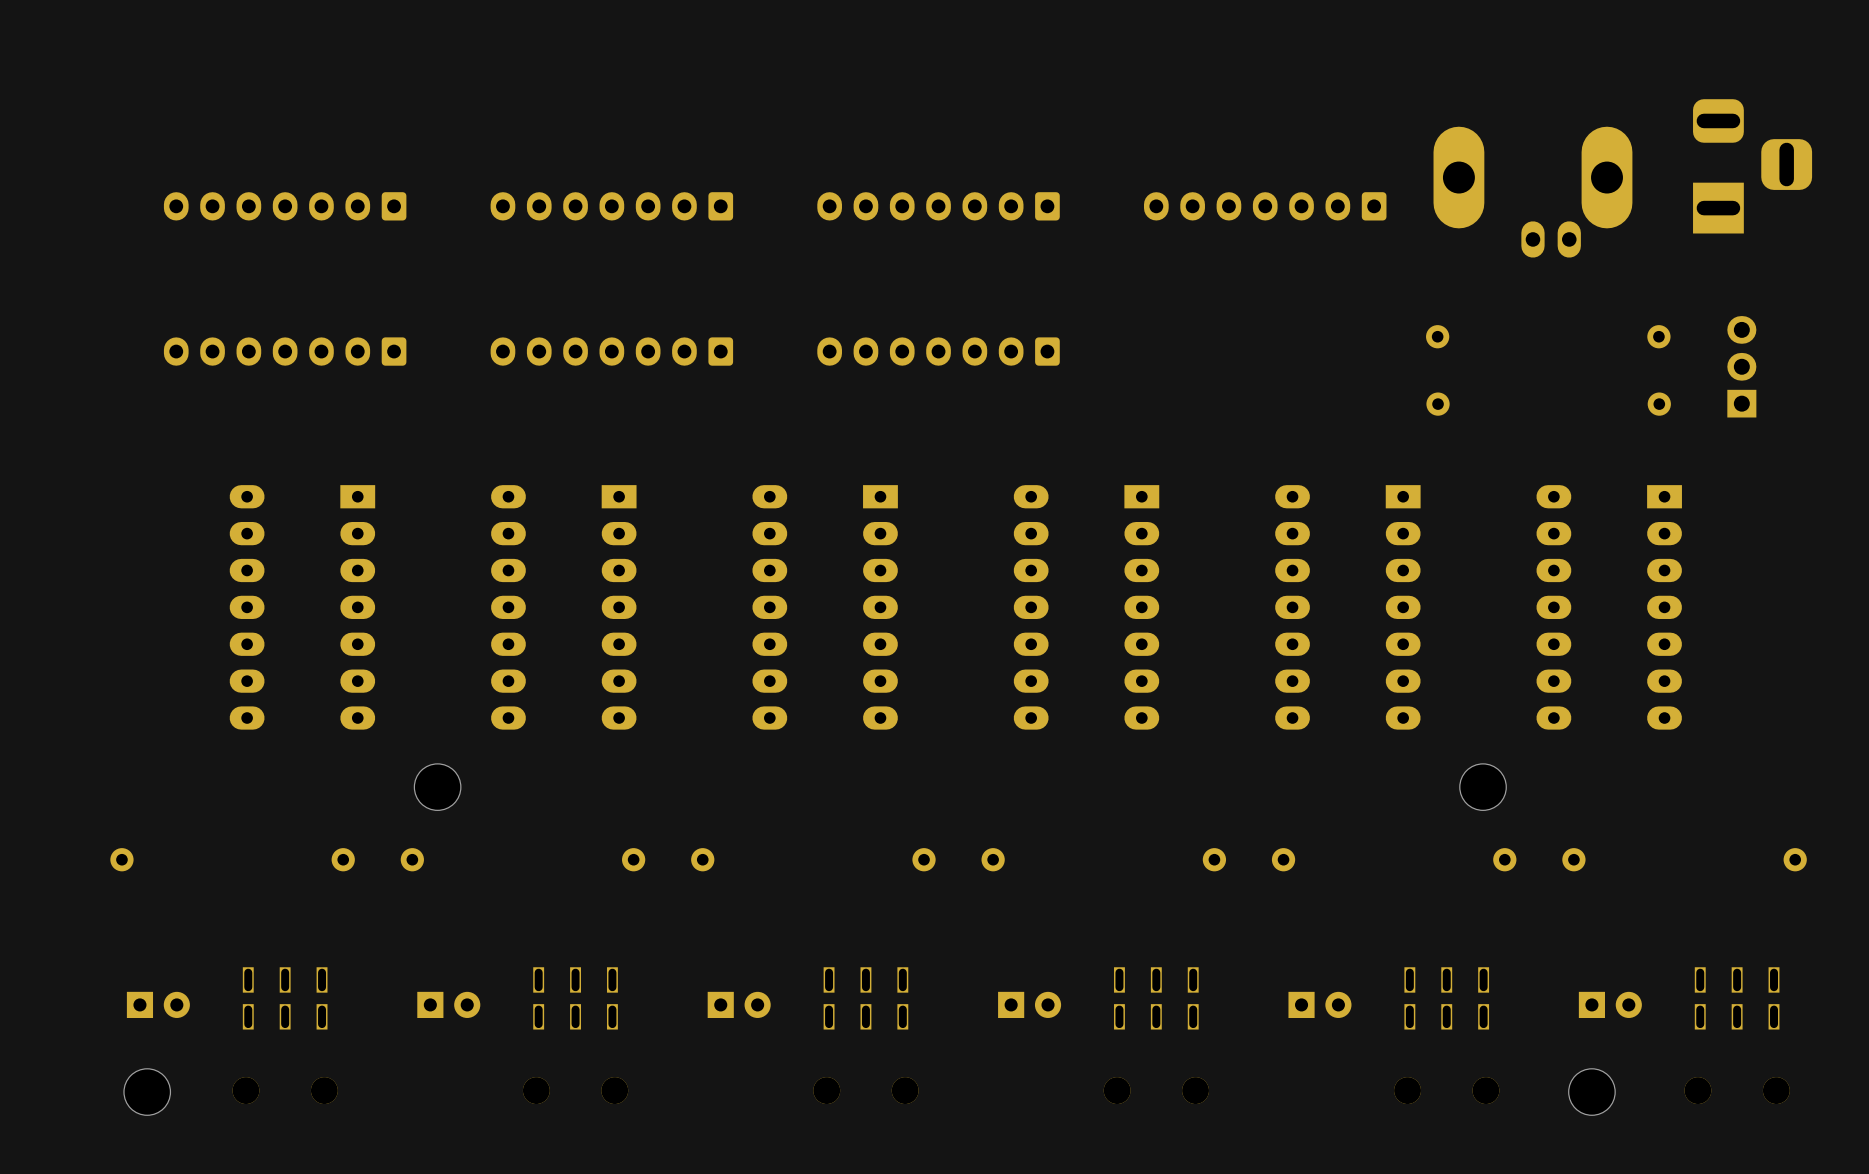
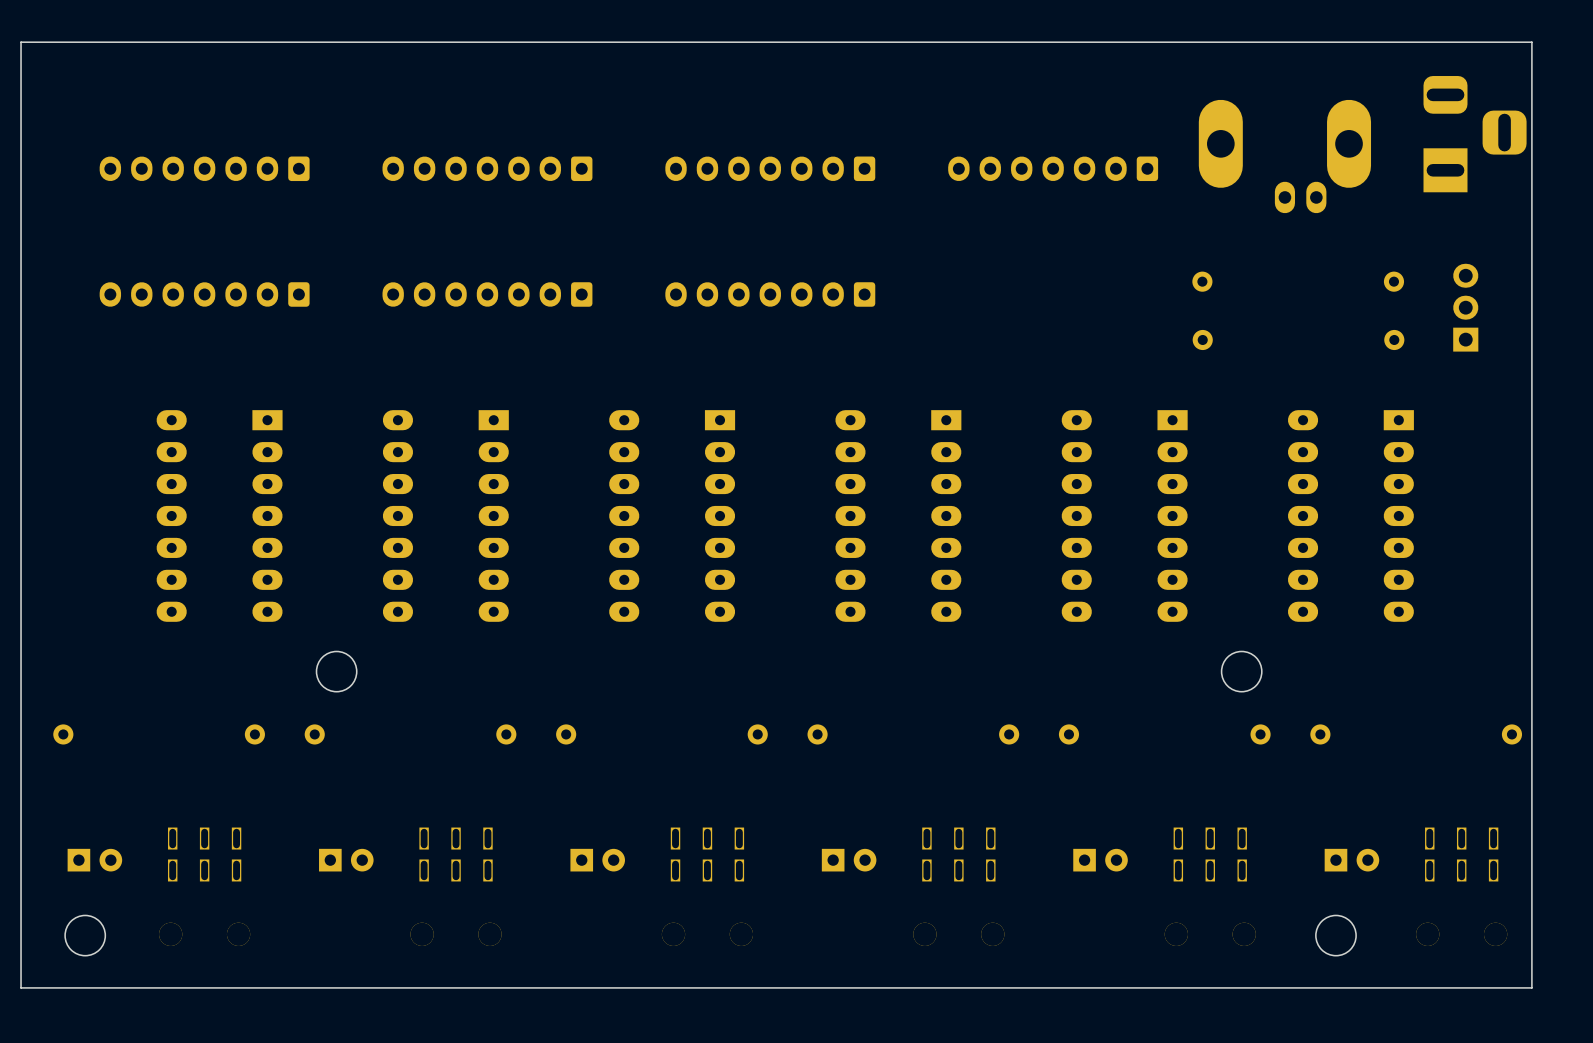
board edge: none -> (1531, 42) (21, 42) (21, 987) (1531, 987) (1531, 42)

